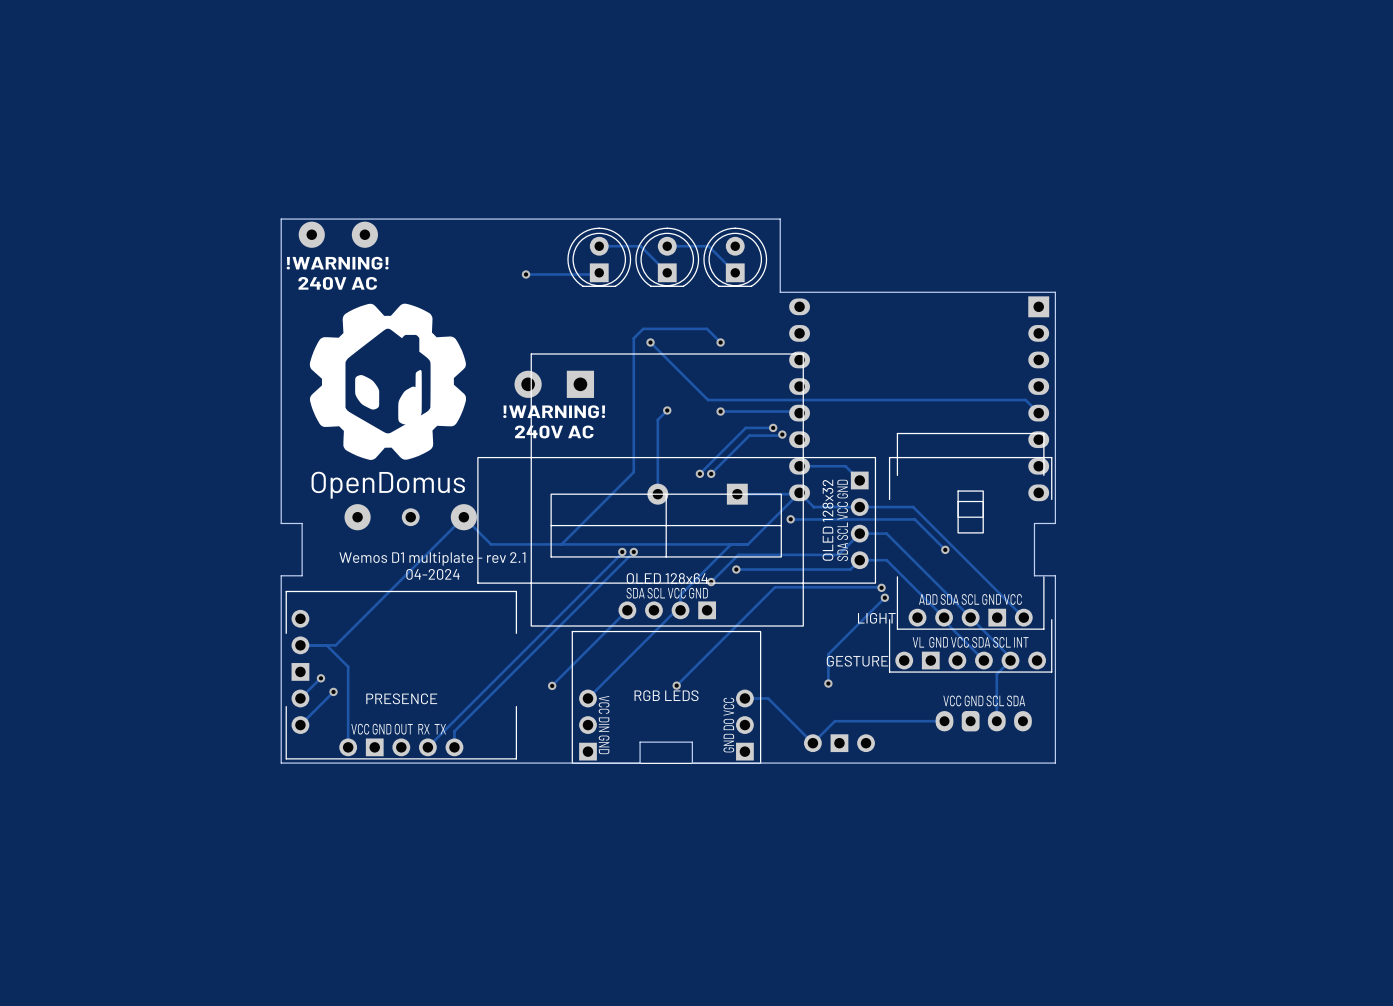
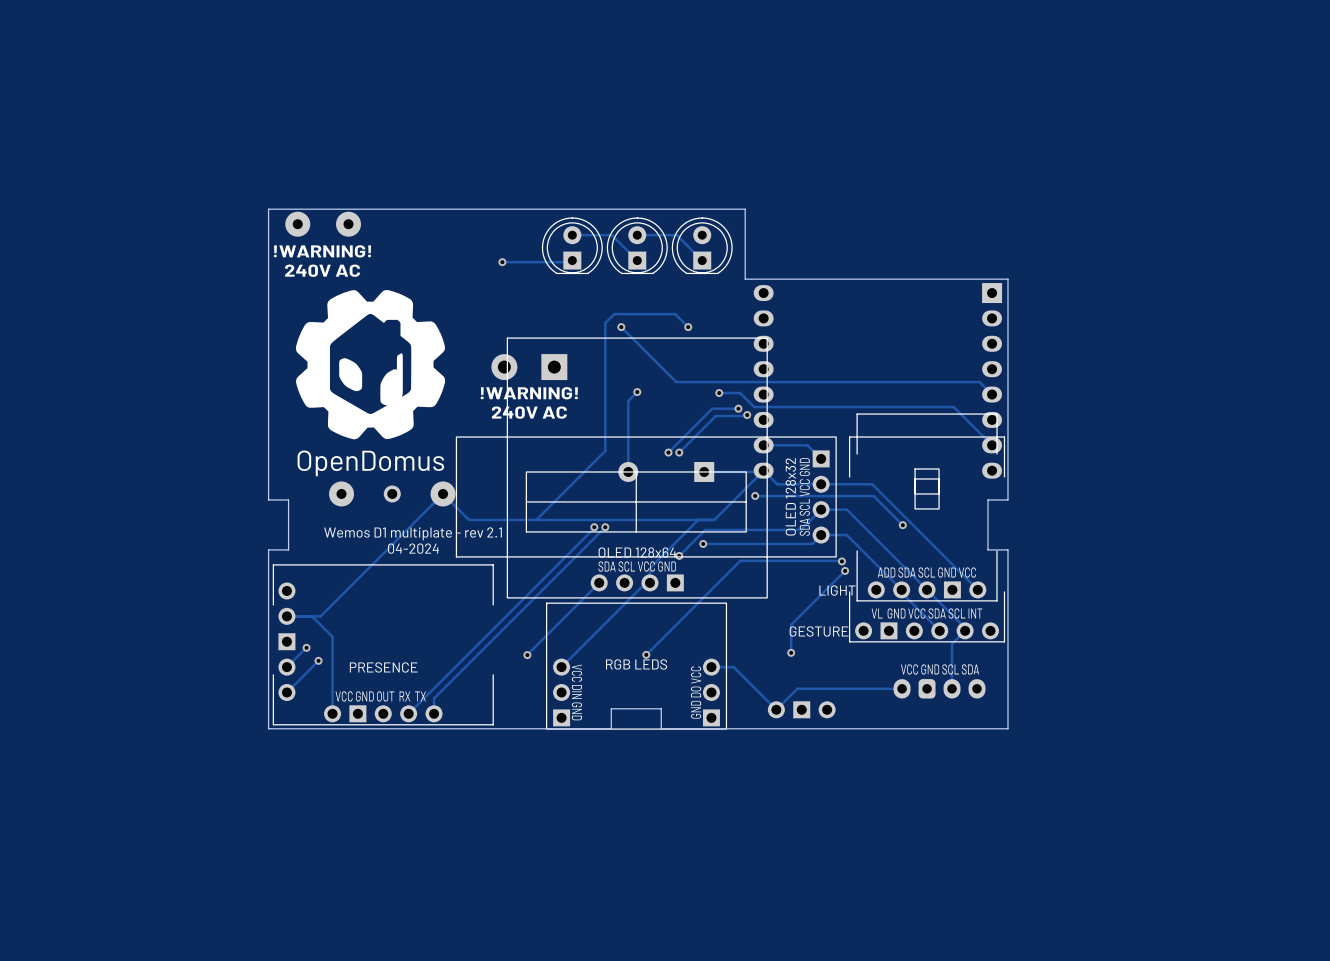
track: (720, 411) (753, 411) -> none
via position: (720, 411) -> (719, 393)
track: (775, 411) (798, 411) -> (740, 393) (754, 407) (953, 407) (992, 445)

